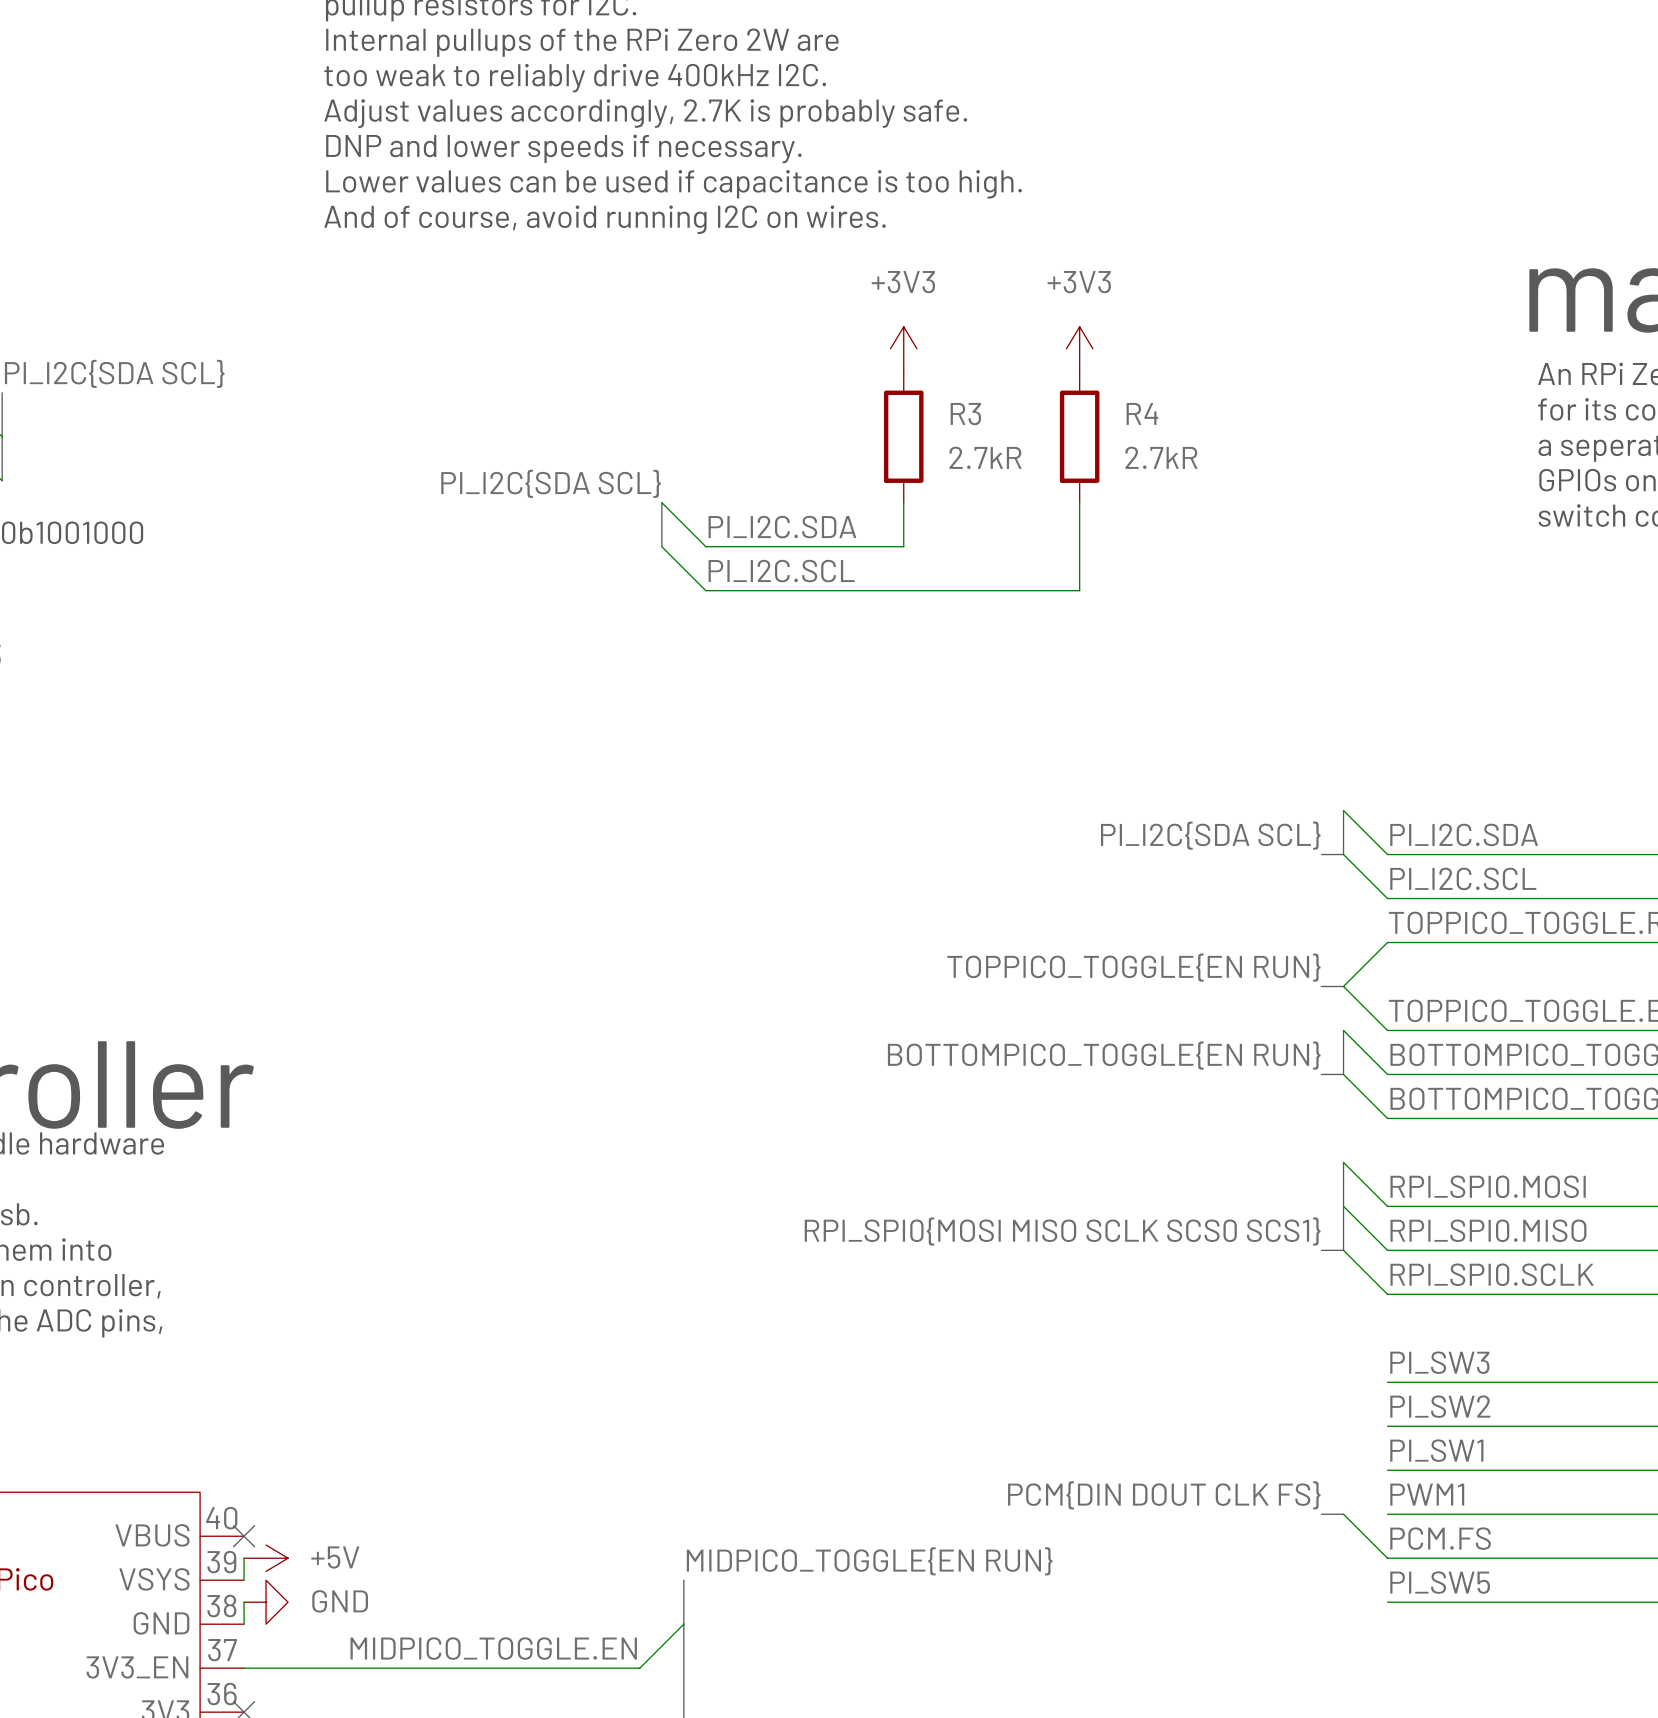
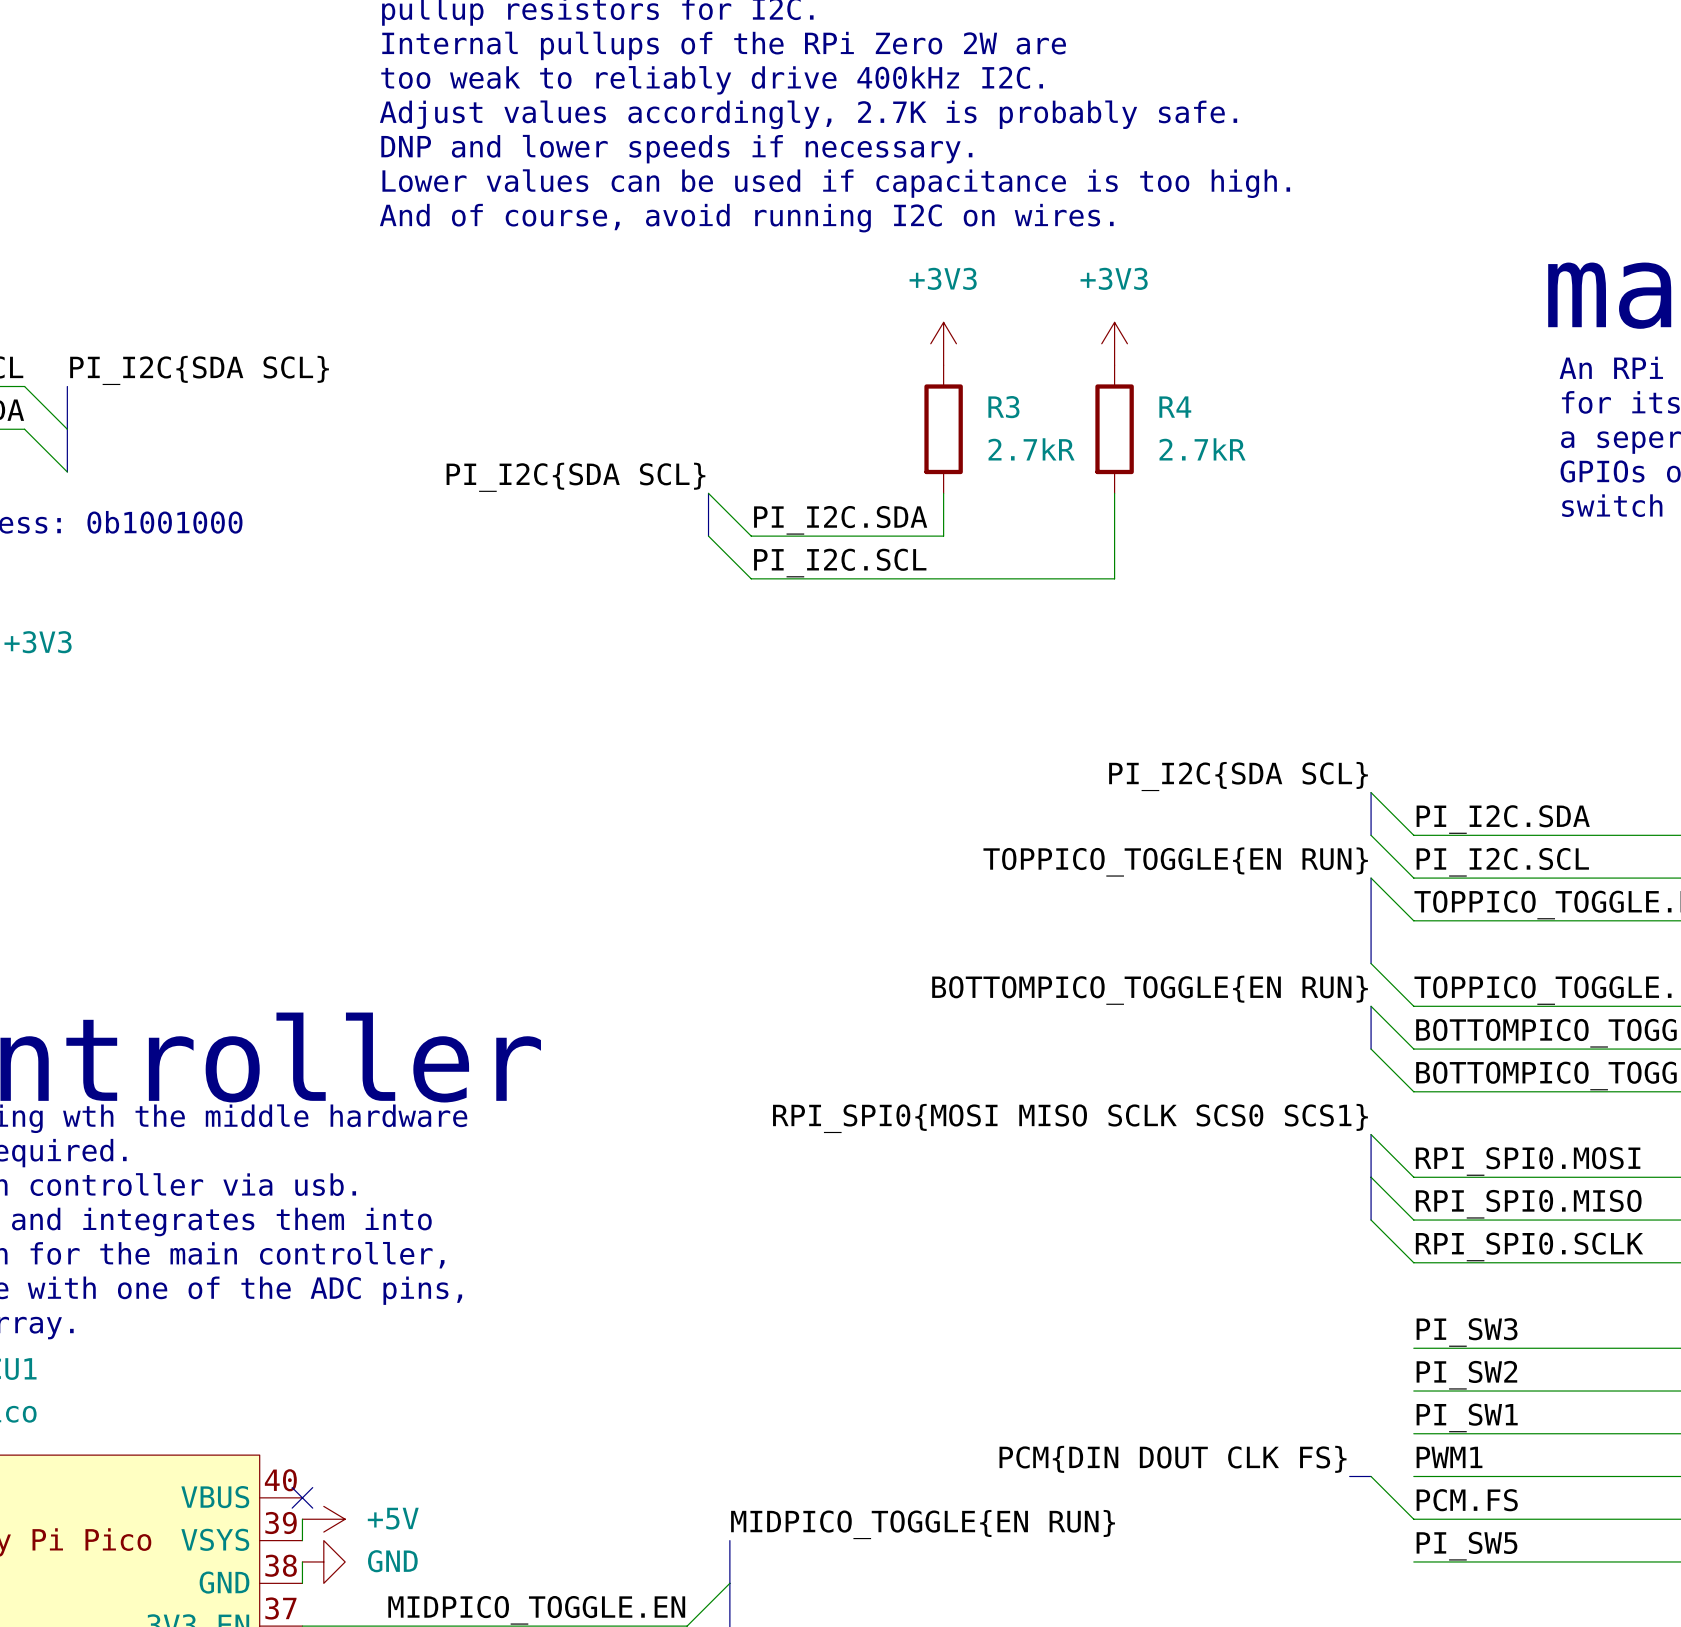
label position: PI_I2C{SDA SCL} (1210, 835) -> PI_I2C{SDA SCL} (1238, 776)
bus: (1321, 854) (1343, 854) -> none
wire: (1387, 942) (1343, 986) -> (1413, 920) (1371, 878)
label position: TOPPICO_TOGGLE{EN RUN} (1133, 967) -> TOPPICO_TOGGLE{EN RUN} (1175, 862)
bus: (1321, 986) (1343, 986) -> (1371, 878) (1371, 963)
label position: BOTTOMPICO_TOGGLE{EN RUN} (1104, 1055) -> BOTTOMPICO_TOGGLE{EN RUN} (1150, 990)
bus: (1321, 1074) (1343, 1074) -> none
label position: RPI_SPI0{MOSI MISO SCLK SCS0 SCS1} (1062, 1231) -> RPI_SPI0{MOSI MISO SCLK SCS0 SCS1} (1070, 1118)
bus: (1321, 1250) (1343, 1250) -> none

